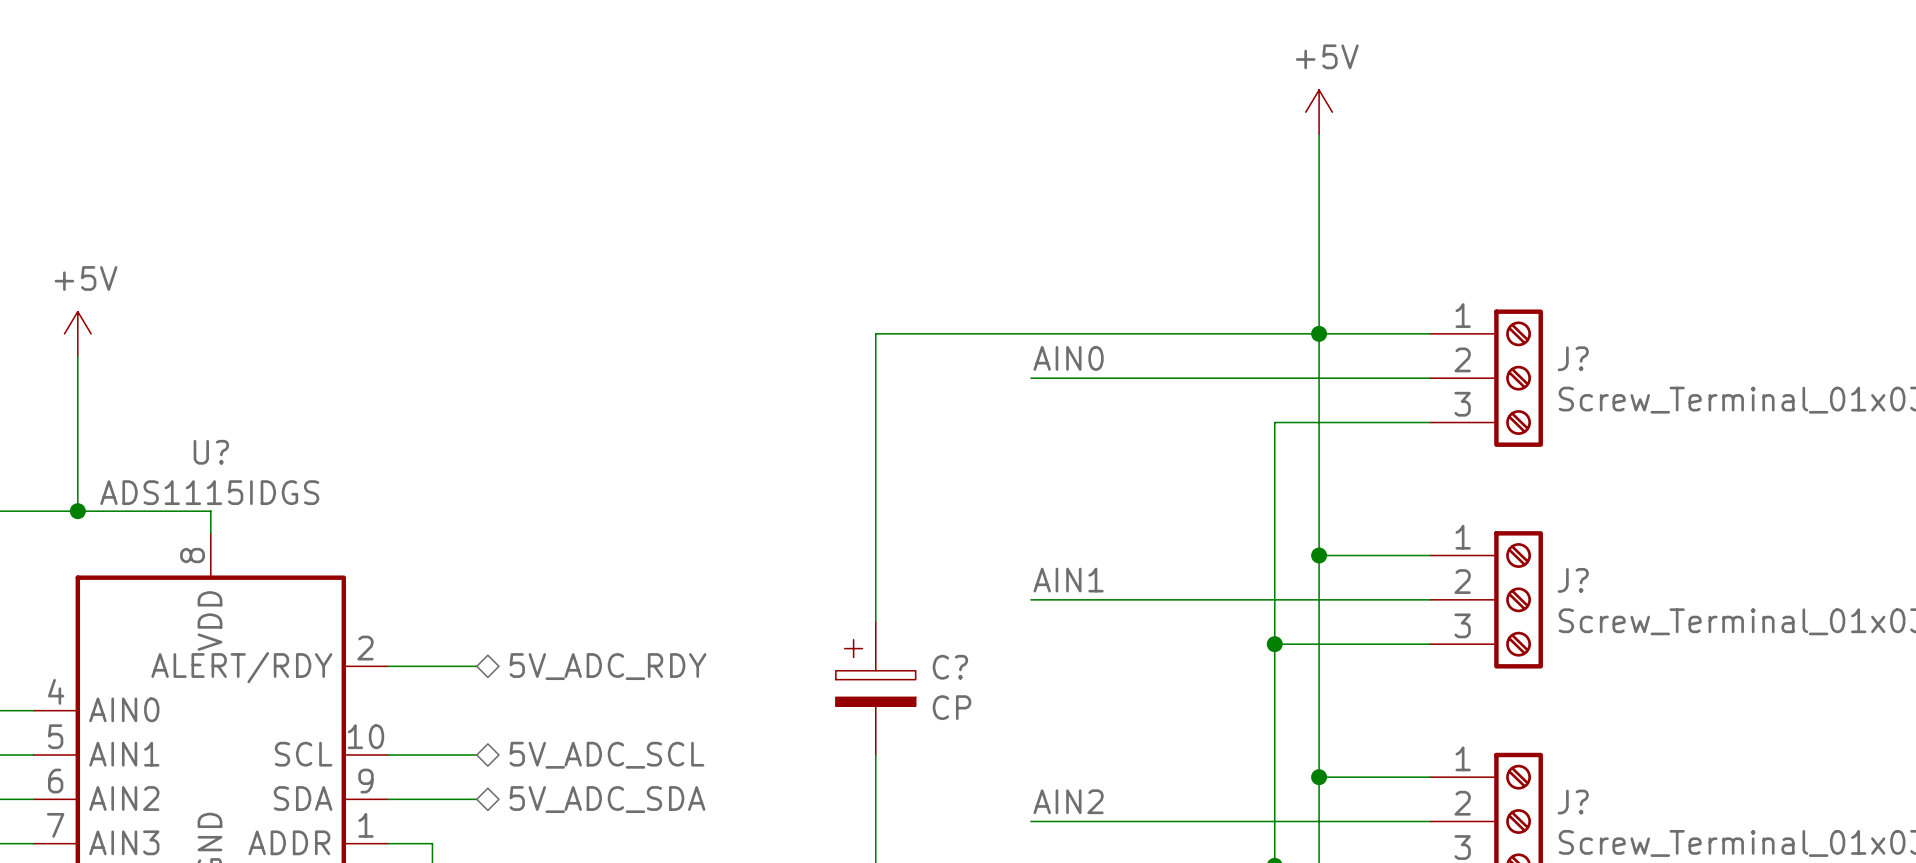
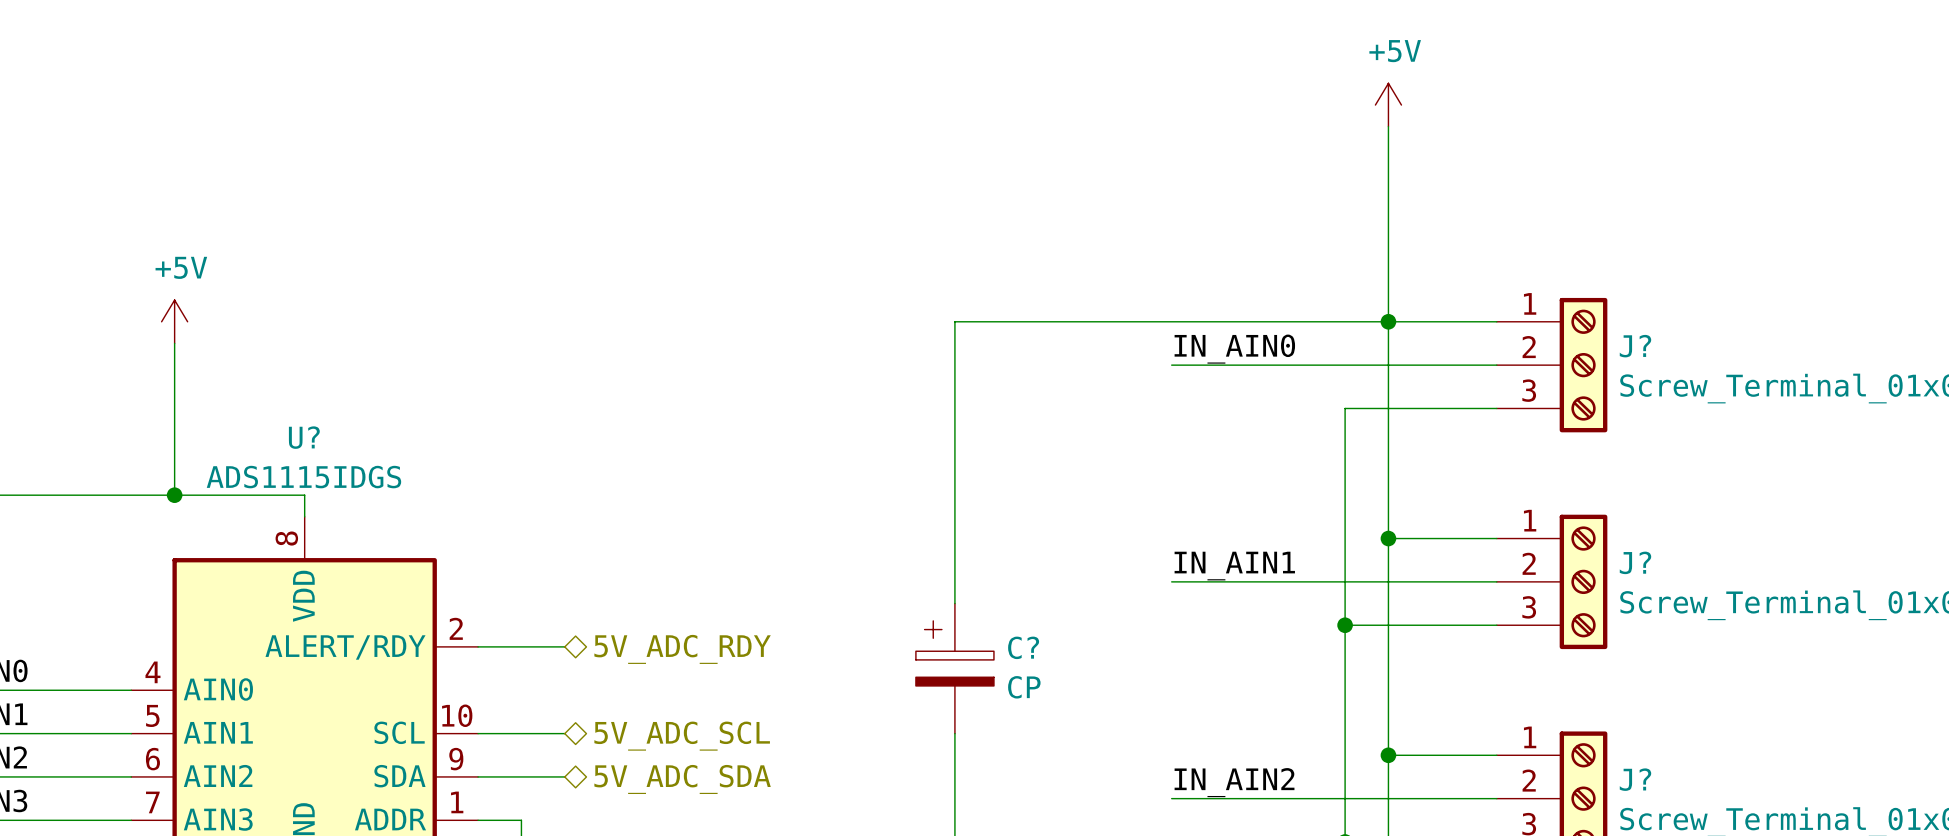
label: AIN0 (1068, 358) -> IN_AIN0 (1234, 349)
wire: (1030, 378) (1097, 378) -> none
label: AIN1 (1068, 580) -> IN_AIN1 (1234, 566)
wire: (1030, 599) (1097, 599) -> none
label: AIN2 (1068, 801) -> IN_AIN2 (1234, 782)
wire: (1030, 821) (1097, 821) -> none

